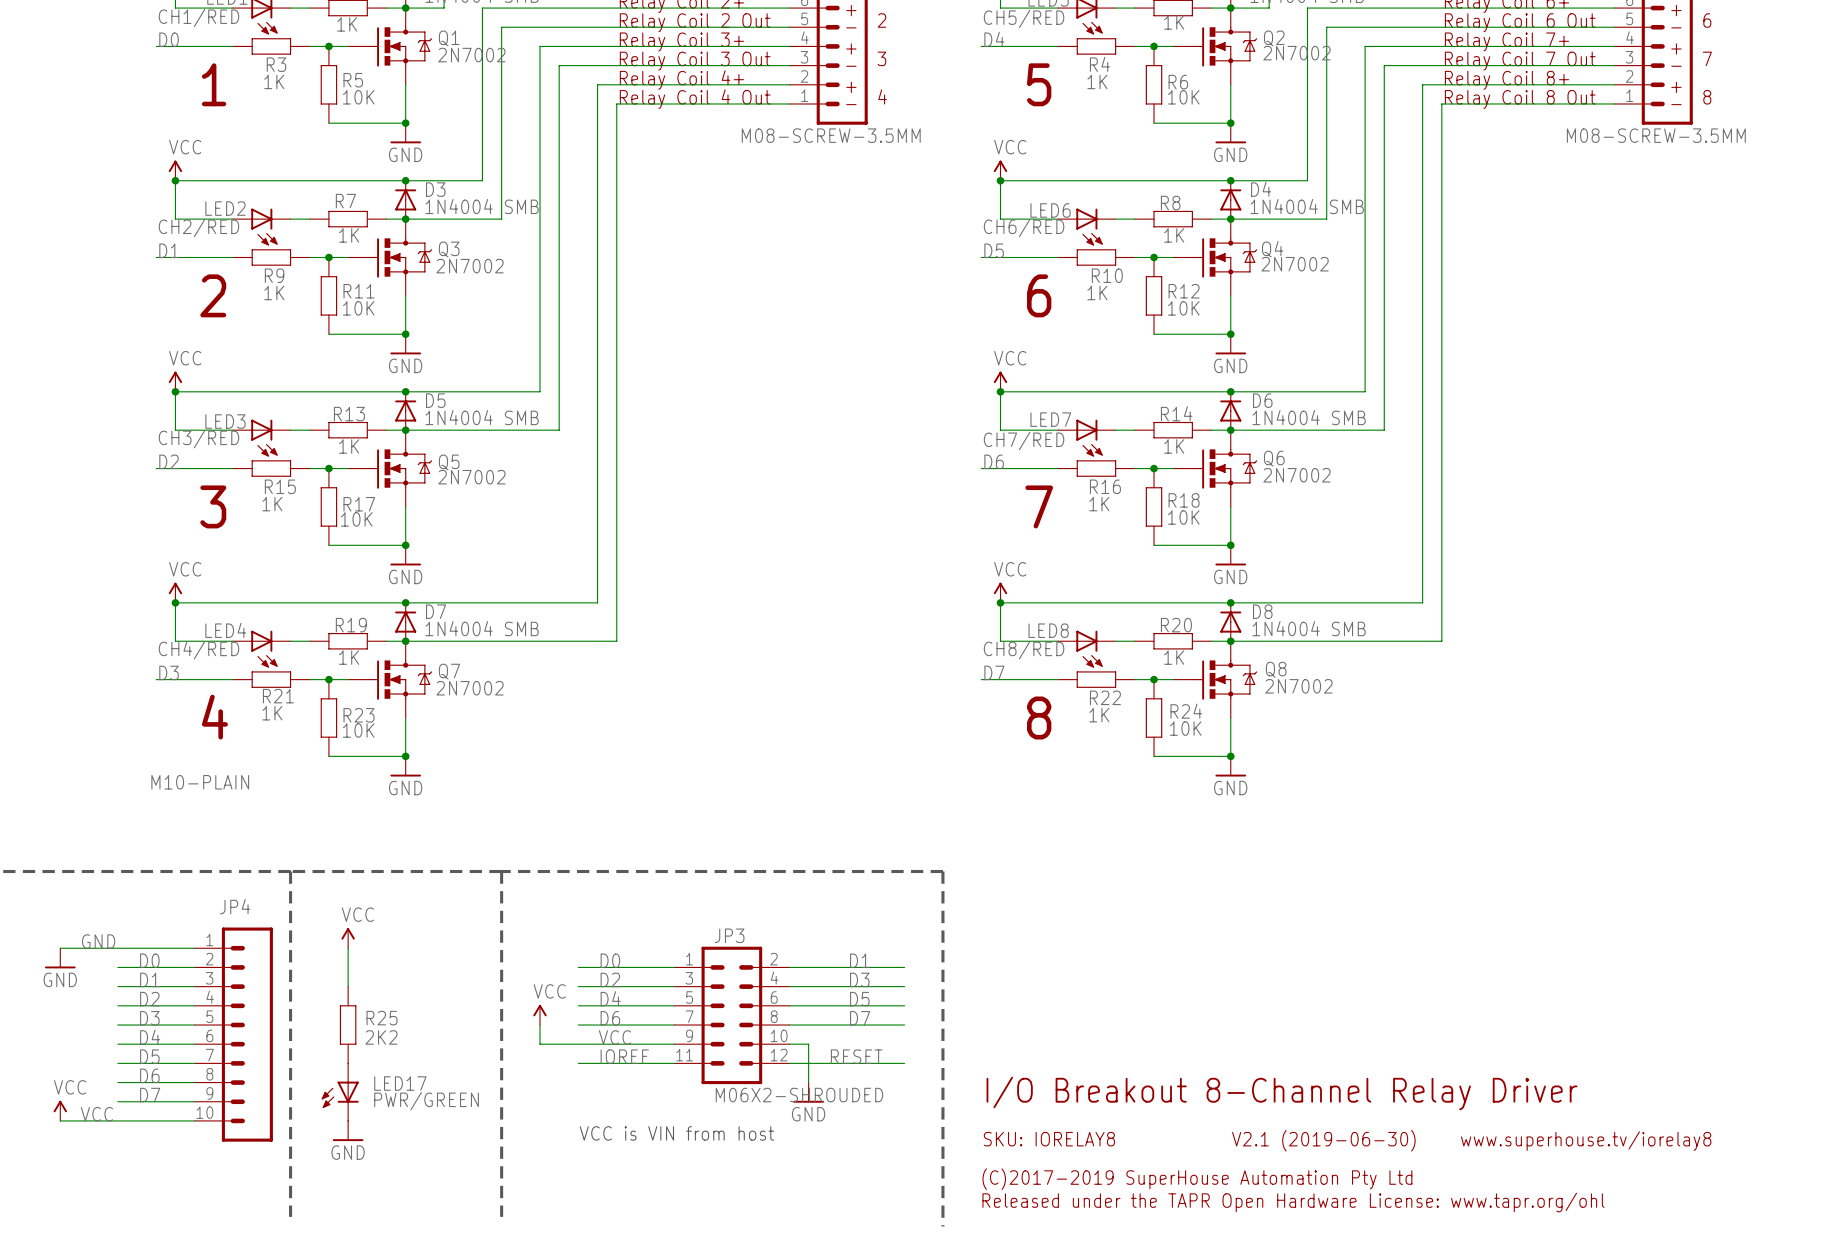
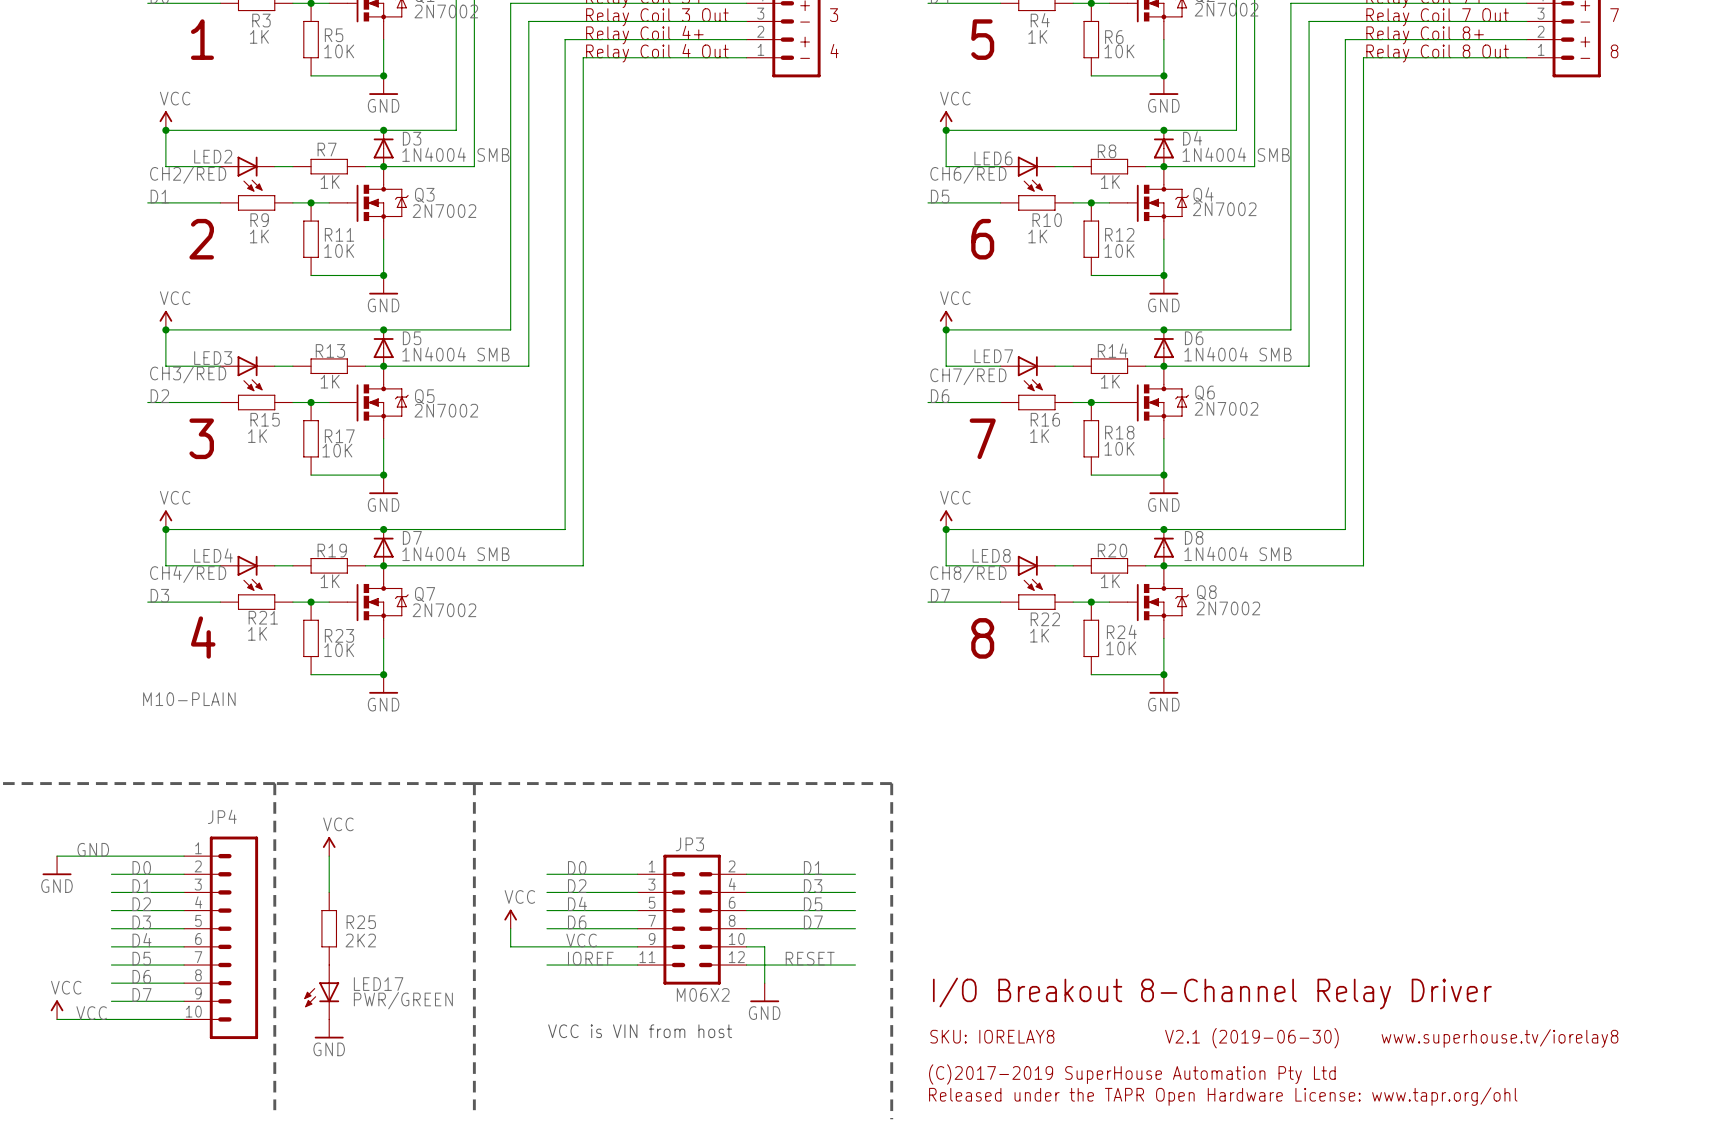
part value: M08-SCREW-3.5MM (831, 135) -> none
part value: M08-SCREW-3.5MM (1656, 135) -> none
JP3 value: M06X2-SHROUDED (799, 1095) -> M06X2 (703, 994)

